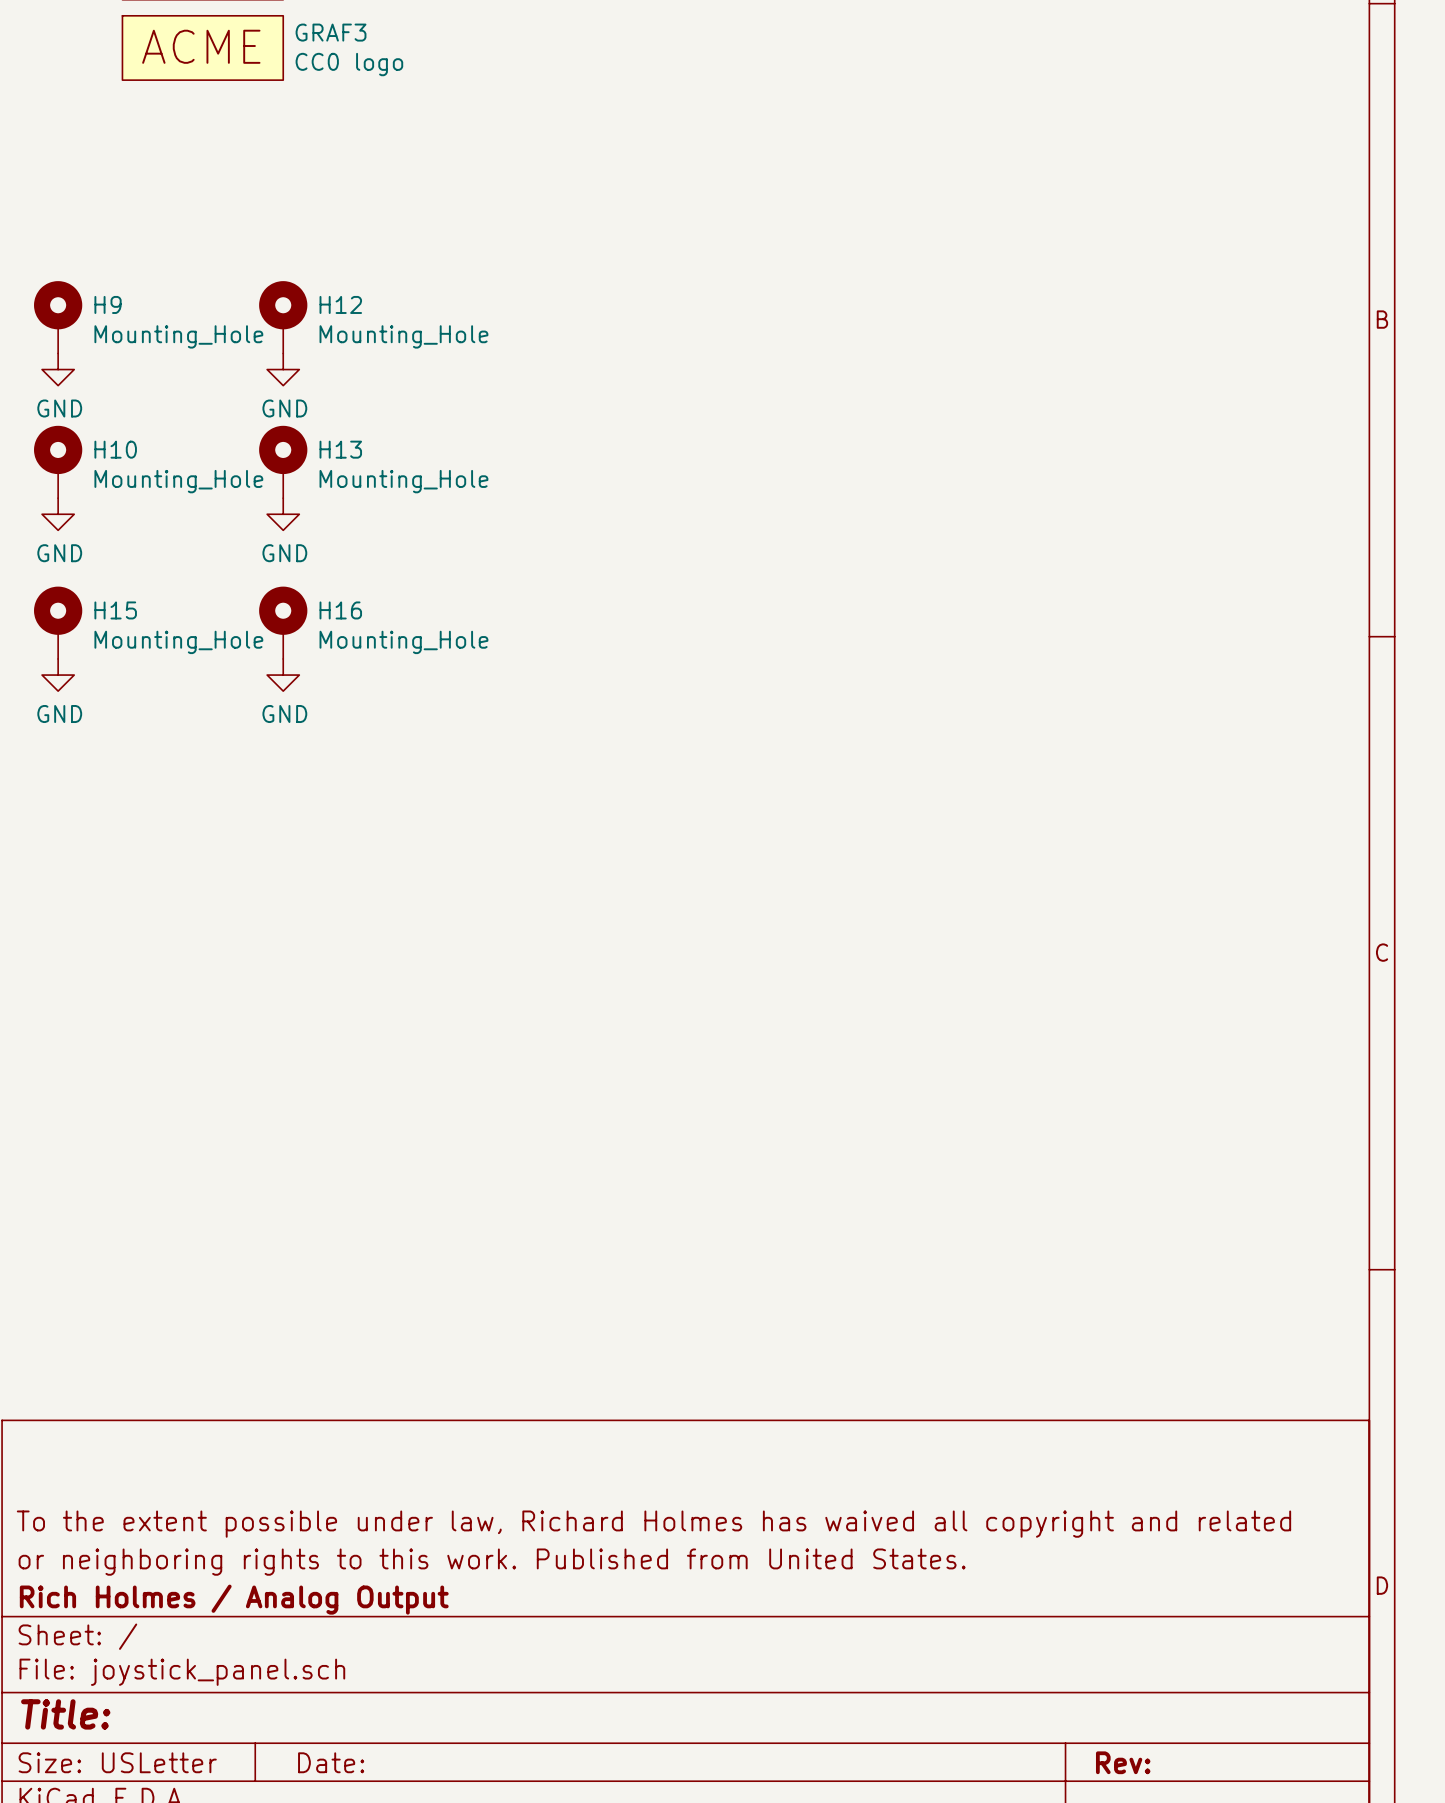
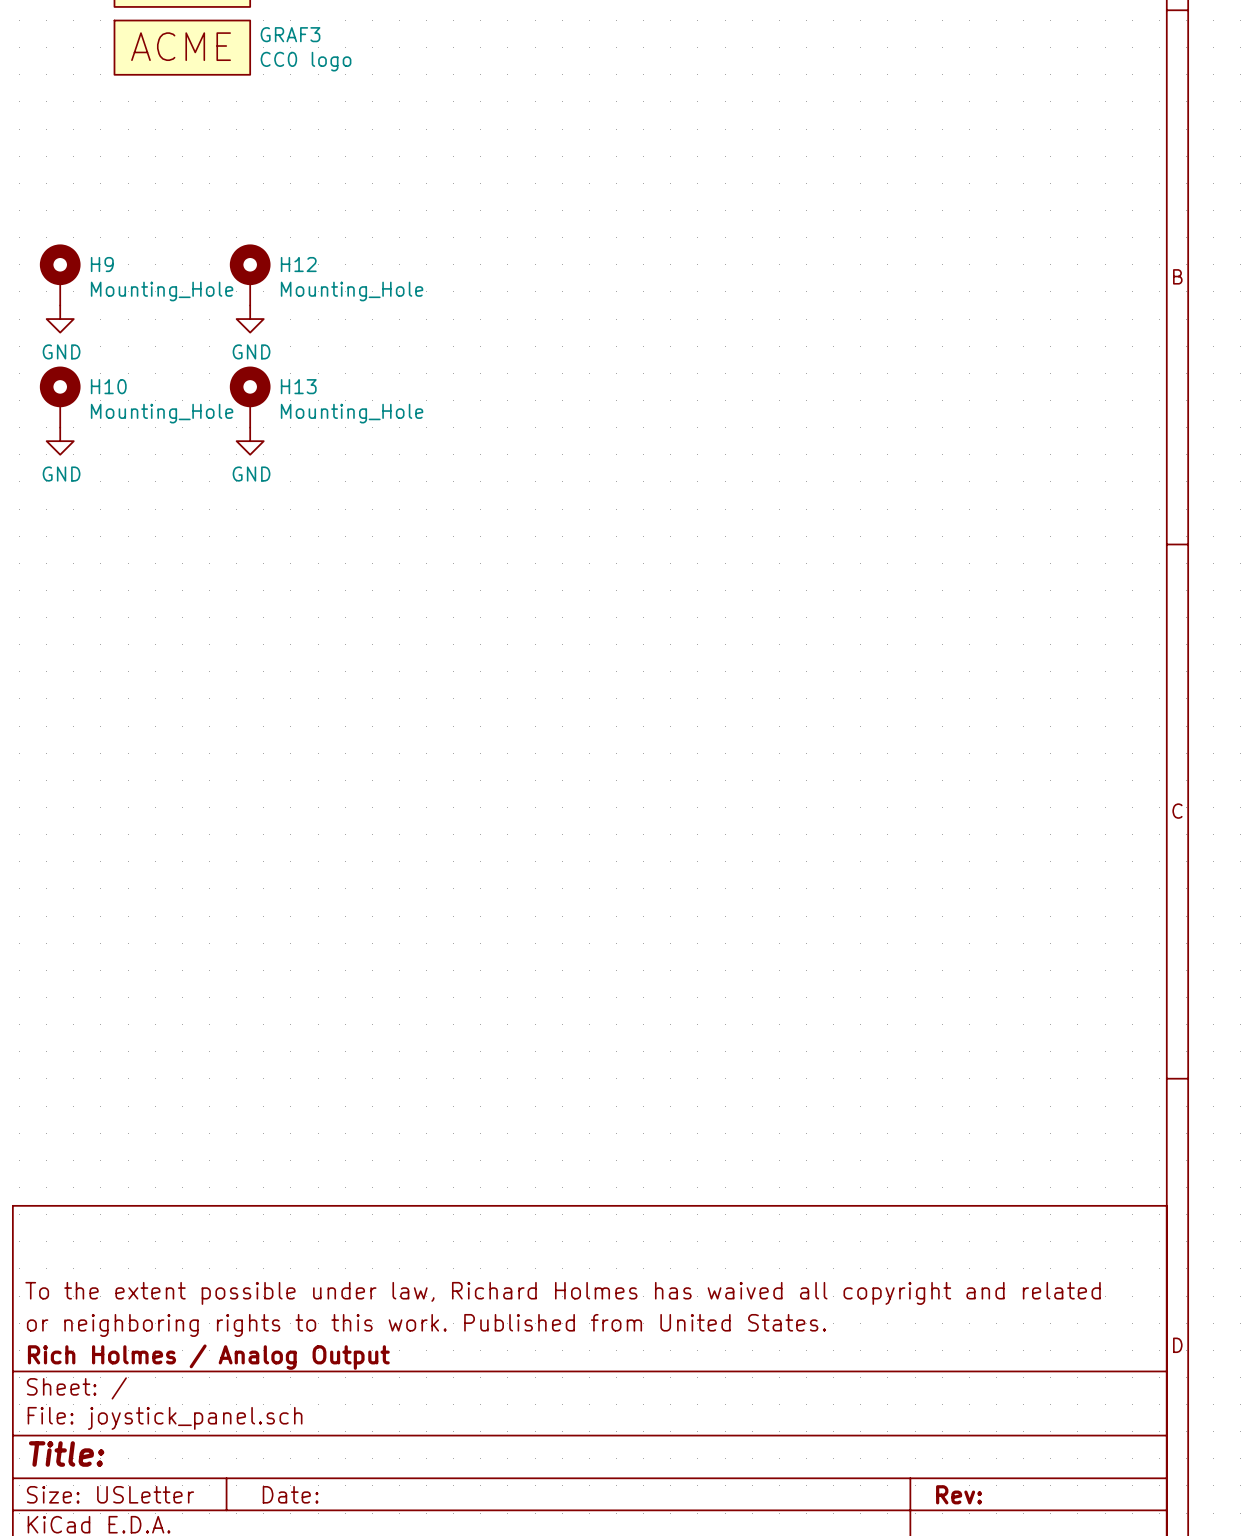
H15: Mounting_Hole (58, 622) -> none
H16: Mounting_Hole (283, 622) -> none
power symbol: GND (58, 675) -> none
power symbol: GND (283, 675) -> none

